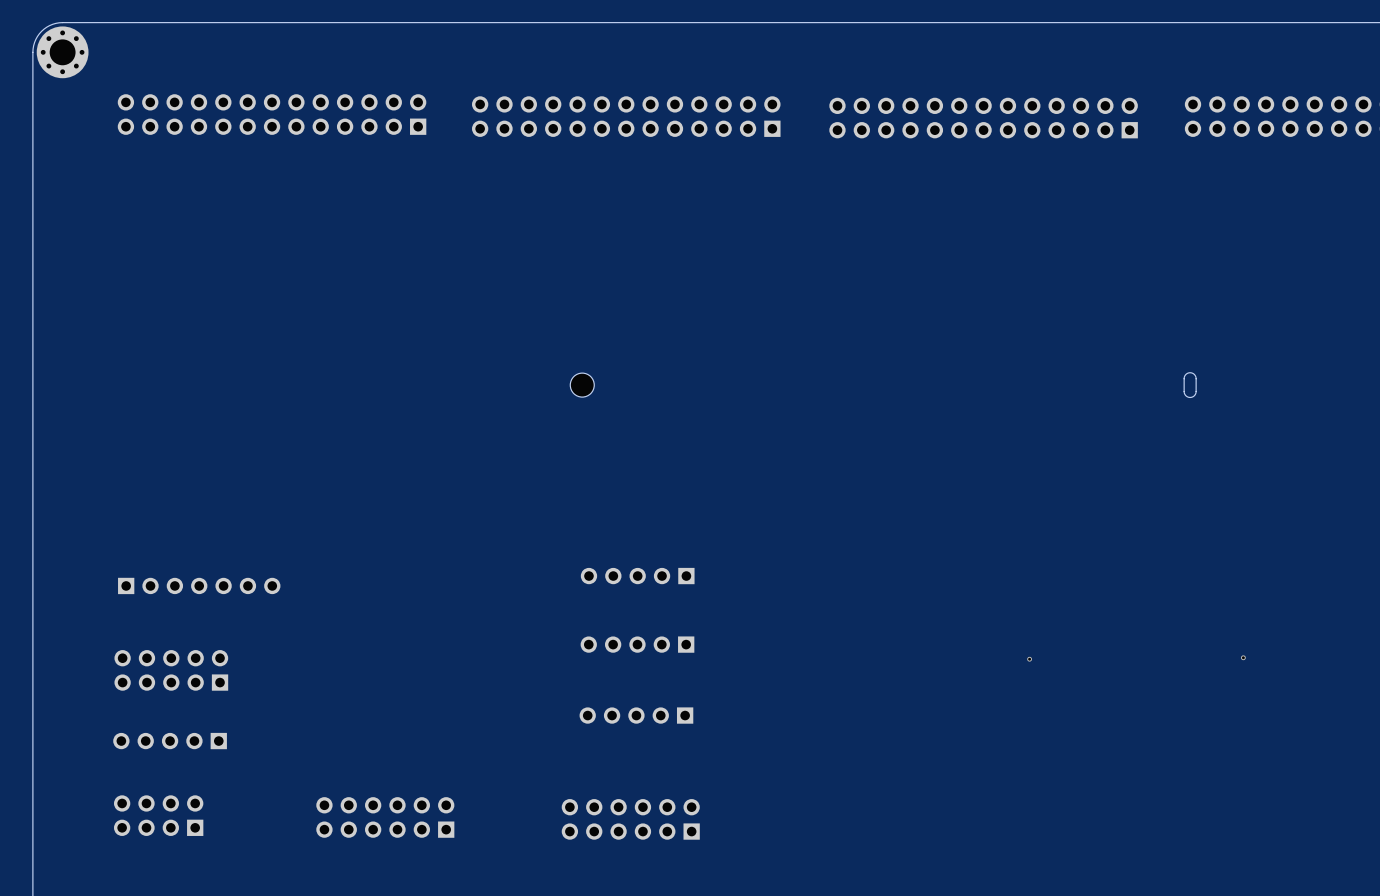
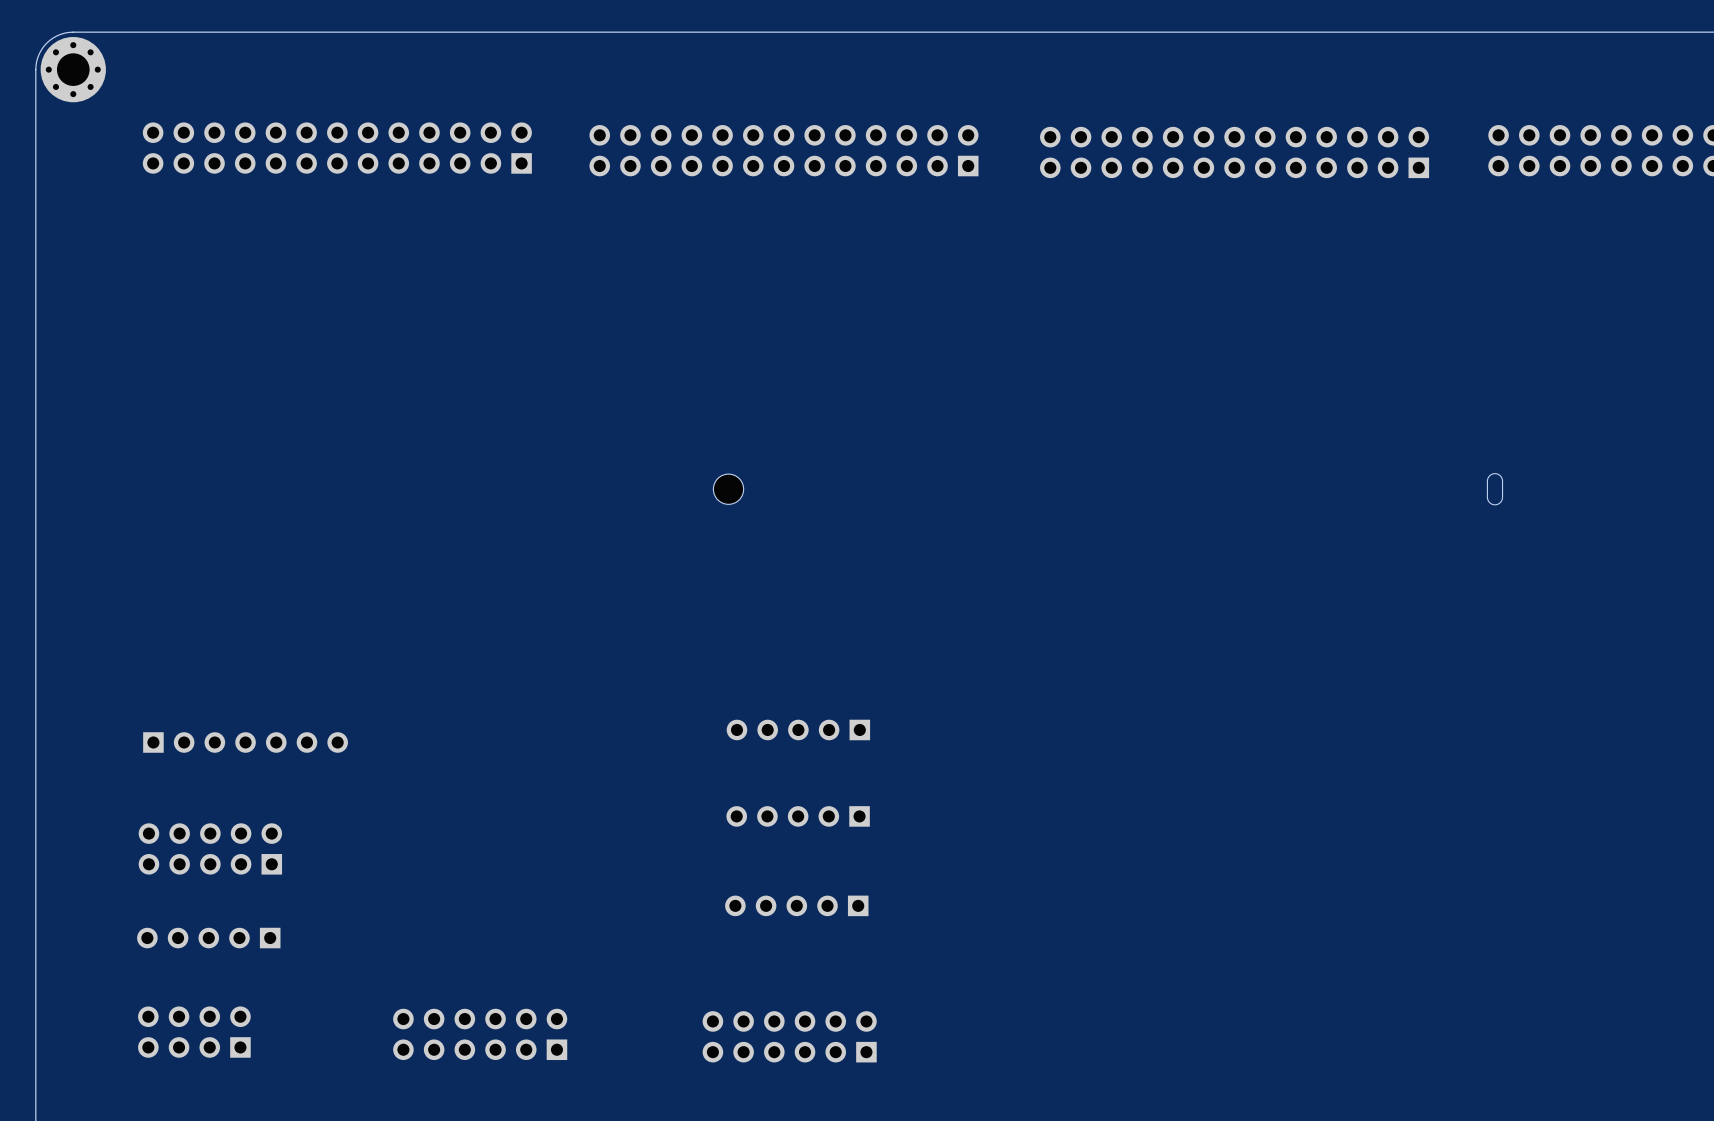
via: (1243, 657) -> none
via: (1029, 659) -> none

